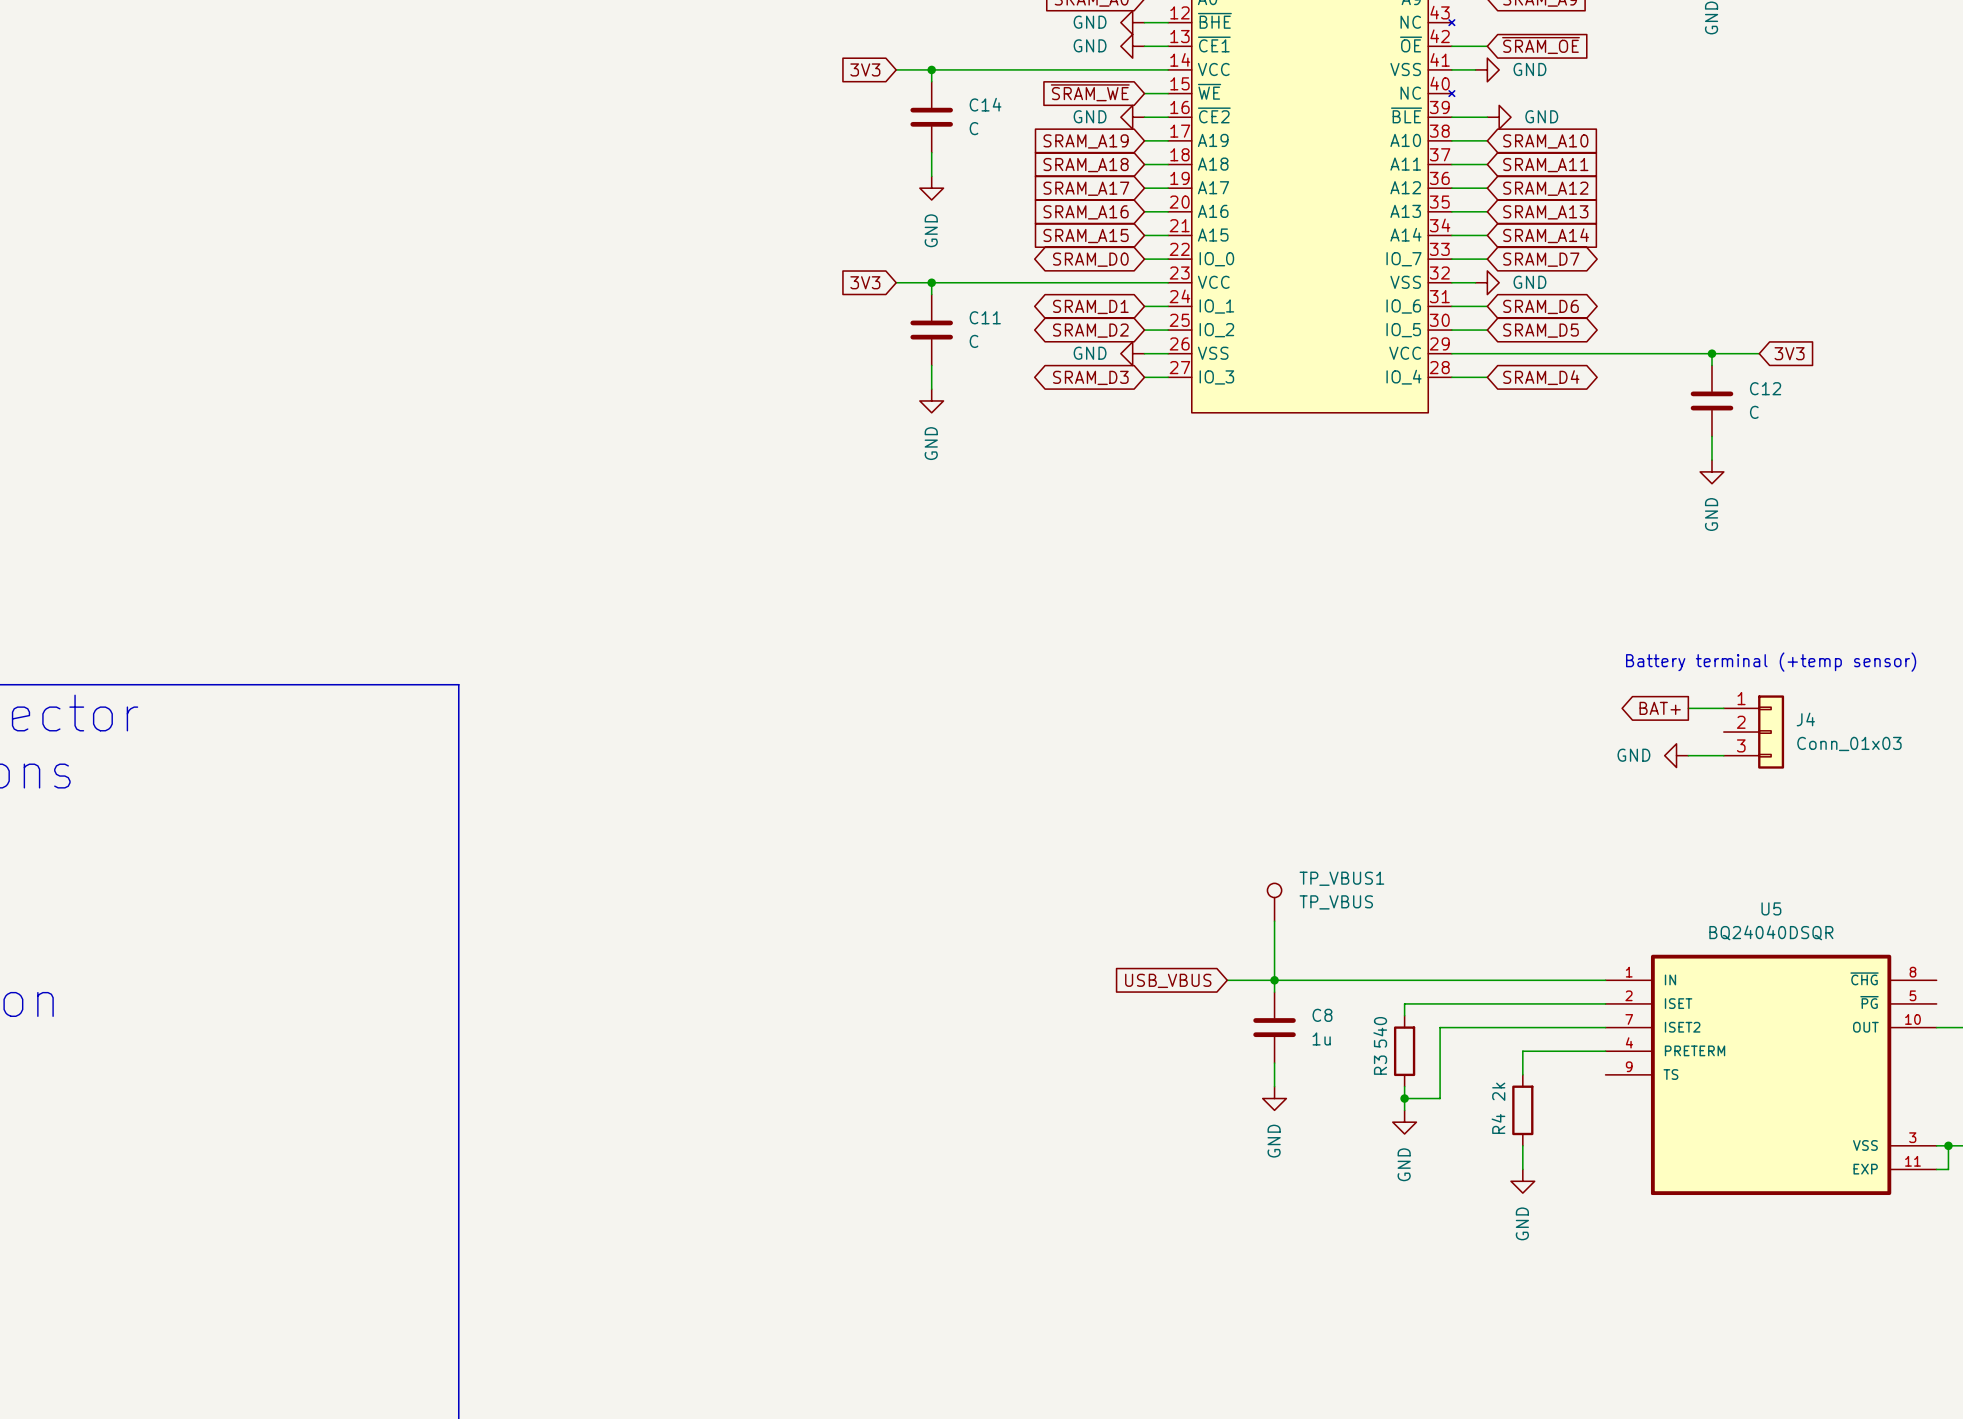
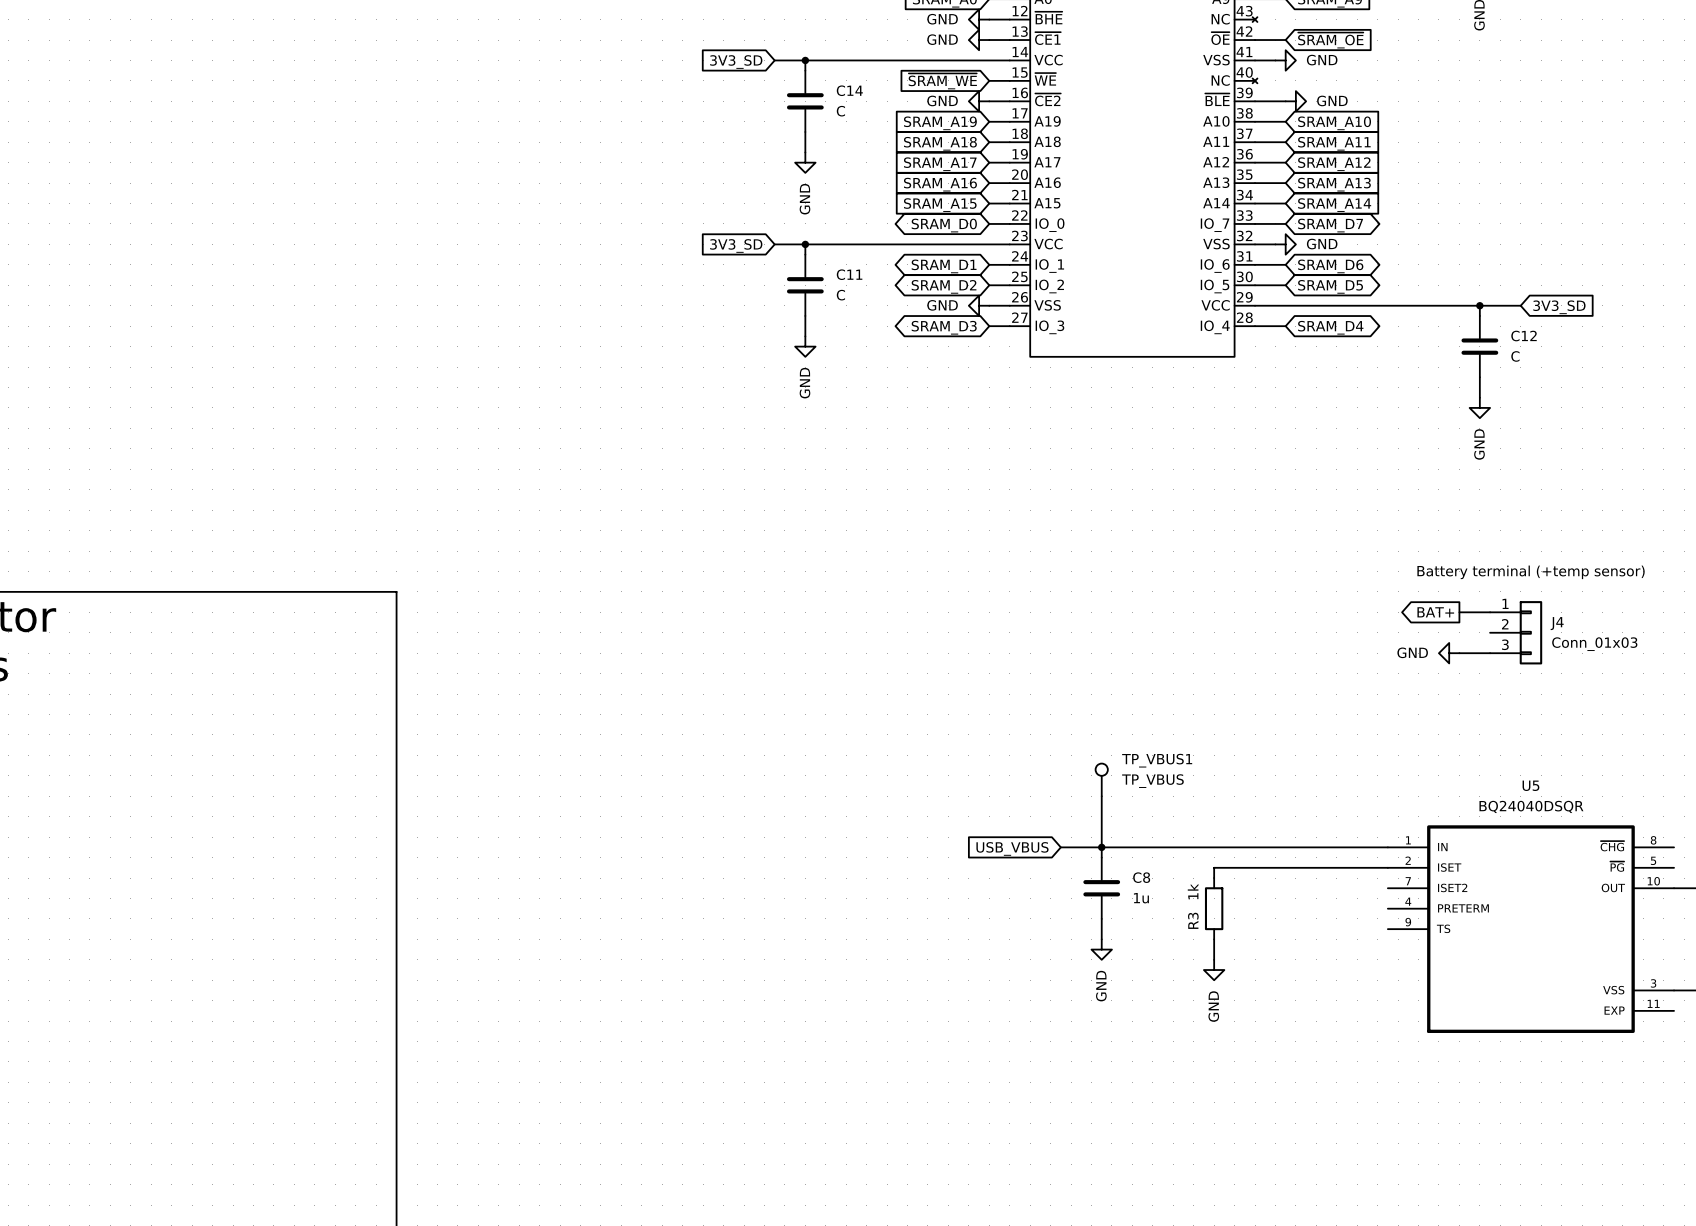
global label: 3V3 (865, 69) -> 3V3_SD (736, 62)
global label: 3V3 (865, 282) -> 3V3_SD (736, 245)
global label: 3V3 (1789, 353) -> 3V3_SD (1559, 307)
wire: (1605, 1027) (1440, 1027) (1440, 1098) (1404, 1098) -> none
R3 value: 540 (1380, 1032) -> 1k (1193, 891)
wire: (1605, 1051) (1522, 1051) (1522, 1074) -> none
junction: (1404, 1098) -> none
R4: 2k (1522, 1110) -> none
wire: (1522, 1145) (1522, 1169) -> none
wire: (1948, 1145) (1948, 1169) (1936, 1169) -> none
junction: (1948, 1145) -> none
power symbol: GND (1522, 1181) -> none

